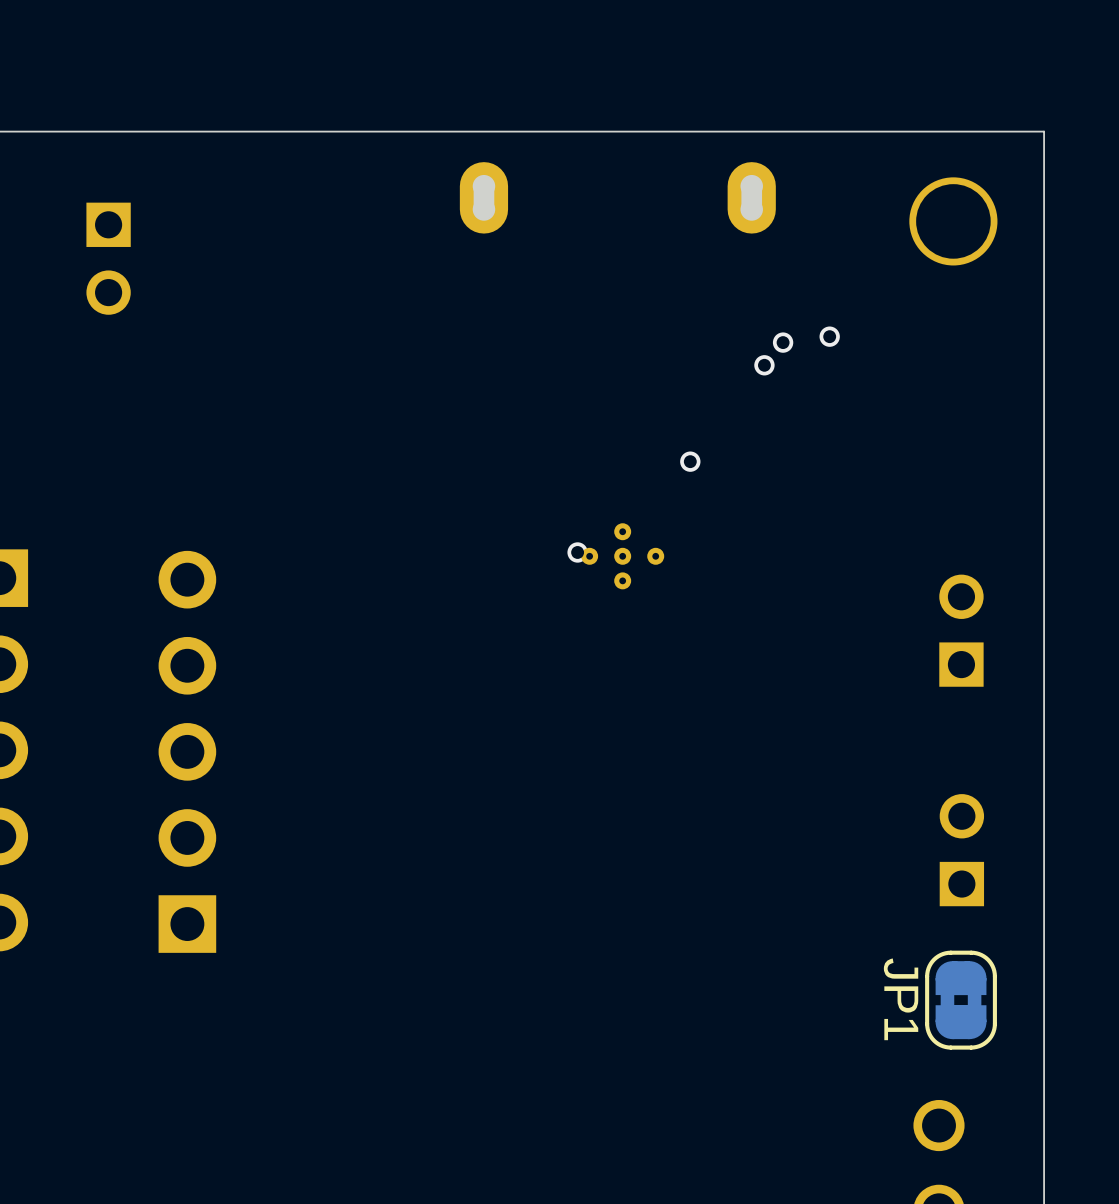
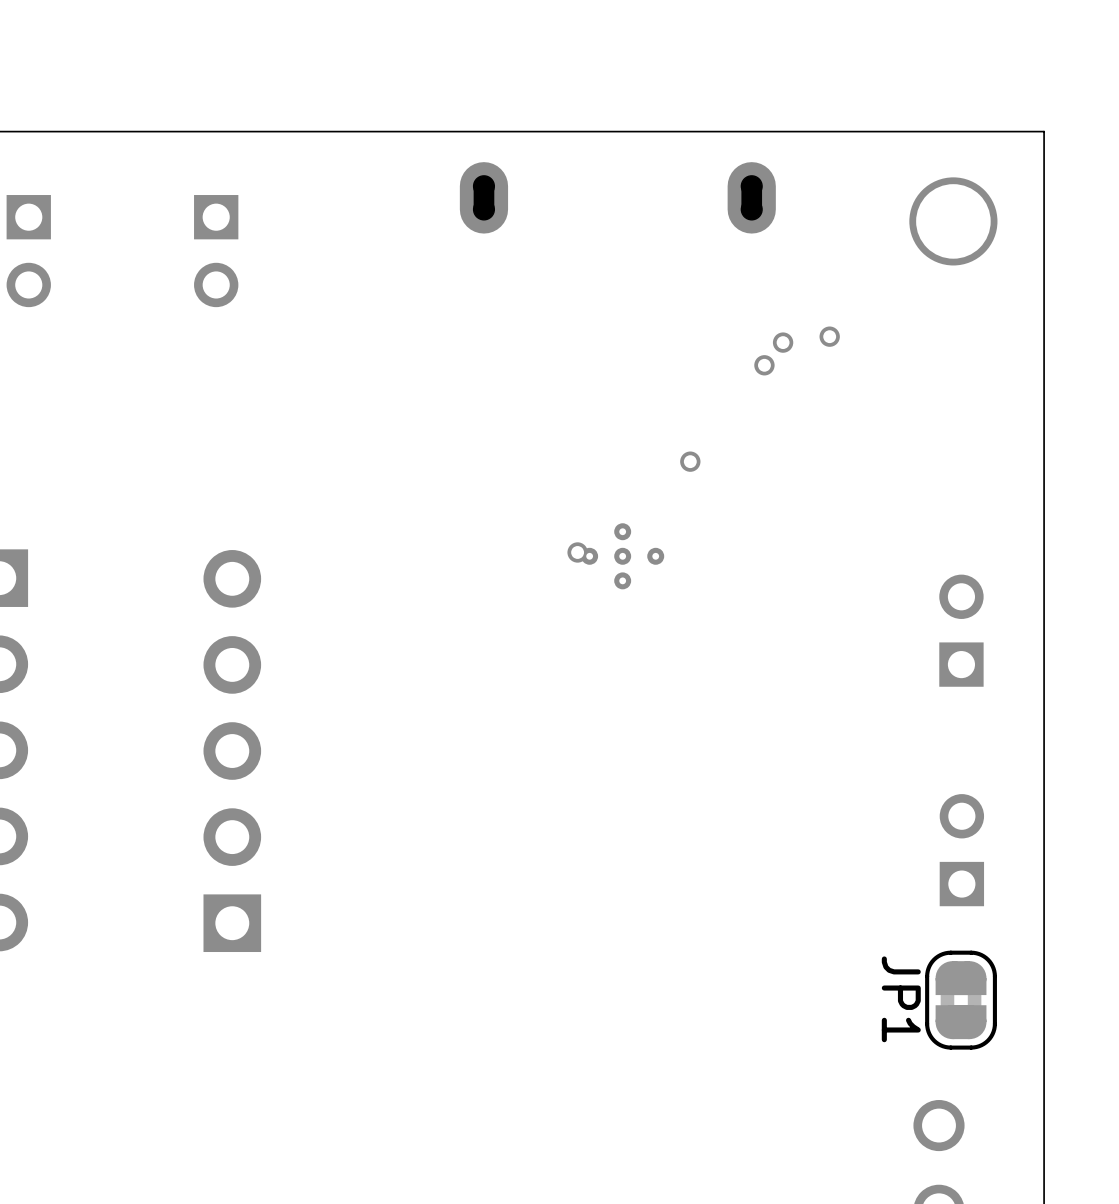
part: none -> (28, 251)
part: none -> (216, 251)
part: (108, 258) -> none
part position: (187, 751) -> (232, 751)

